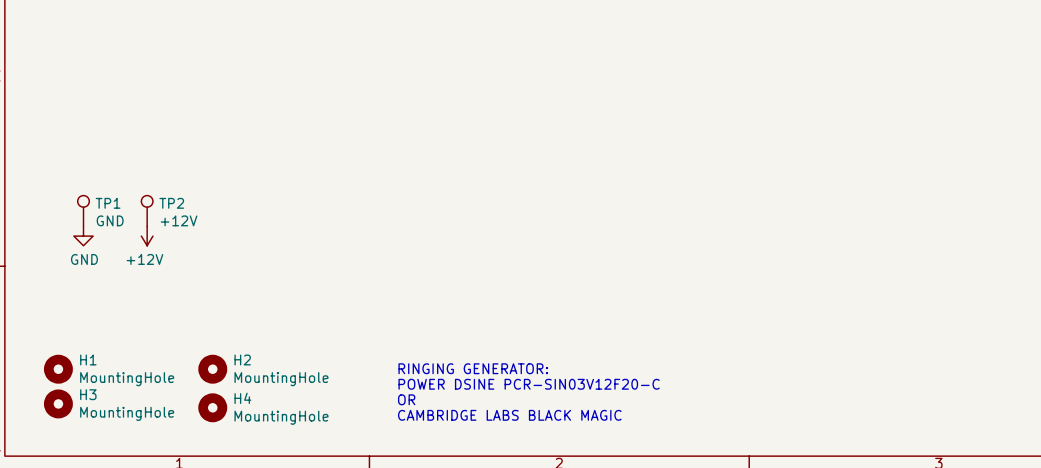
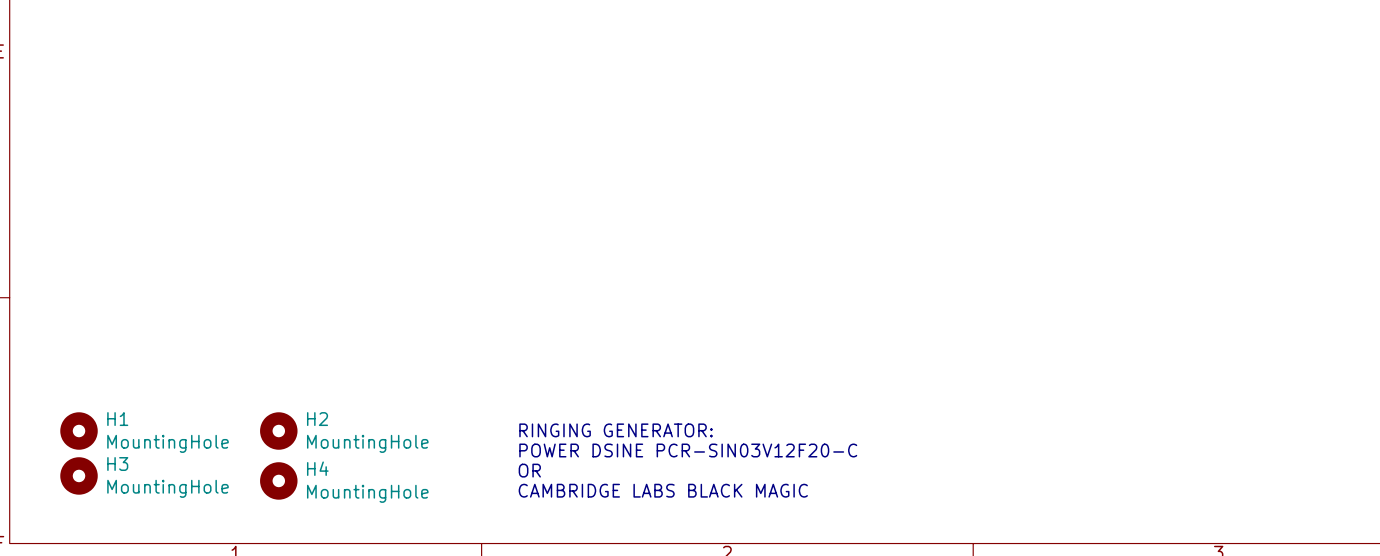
TP1: GND (83, 211) -> none
TP2: +12V (147, 211) -> none
power symbol: GND (83, 236) -> none
power symbol: +12V (147, 236) -> none

